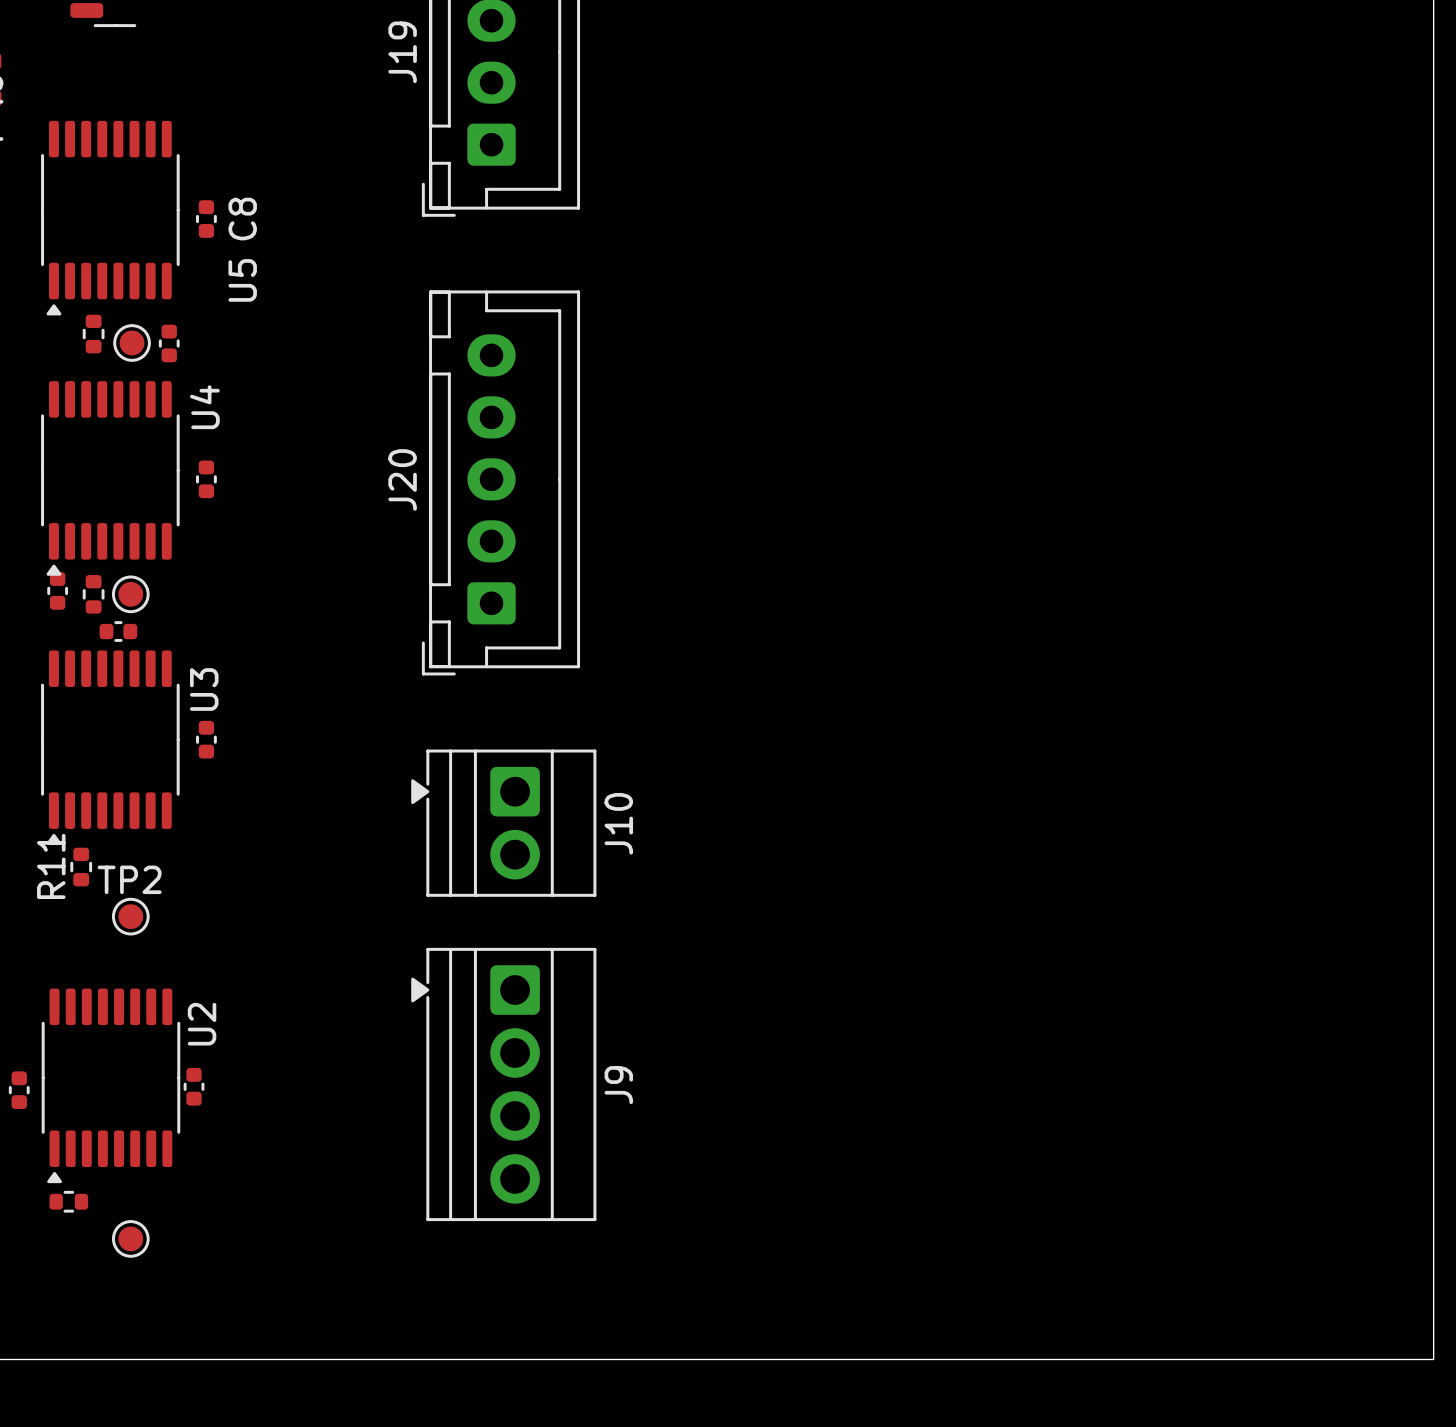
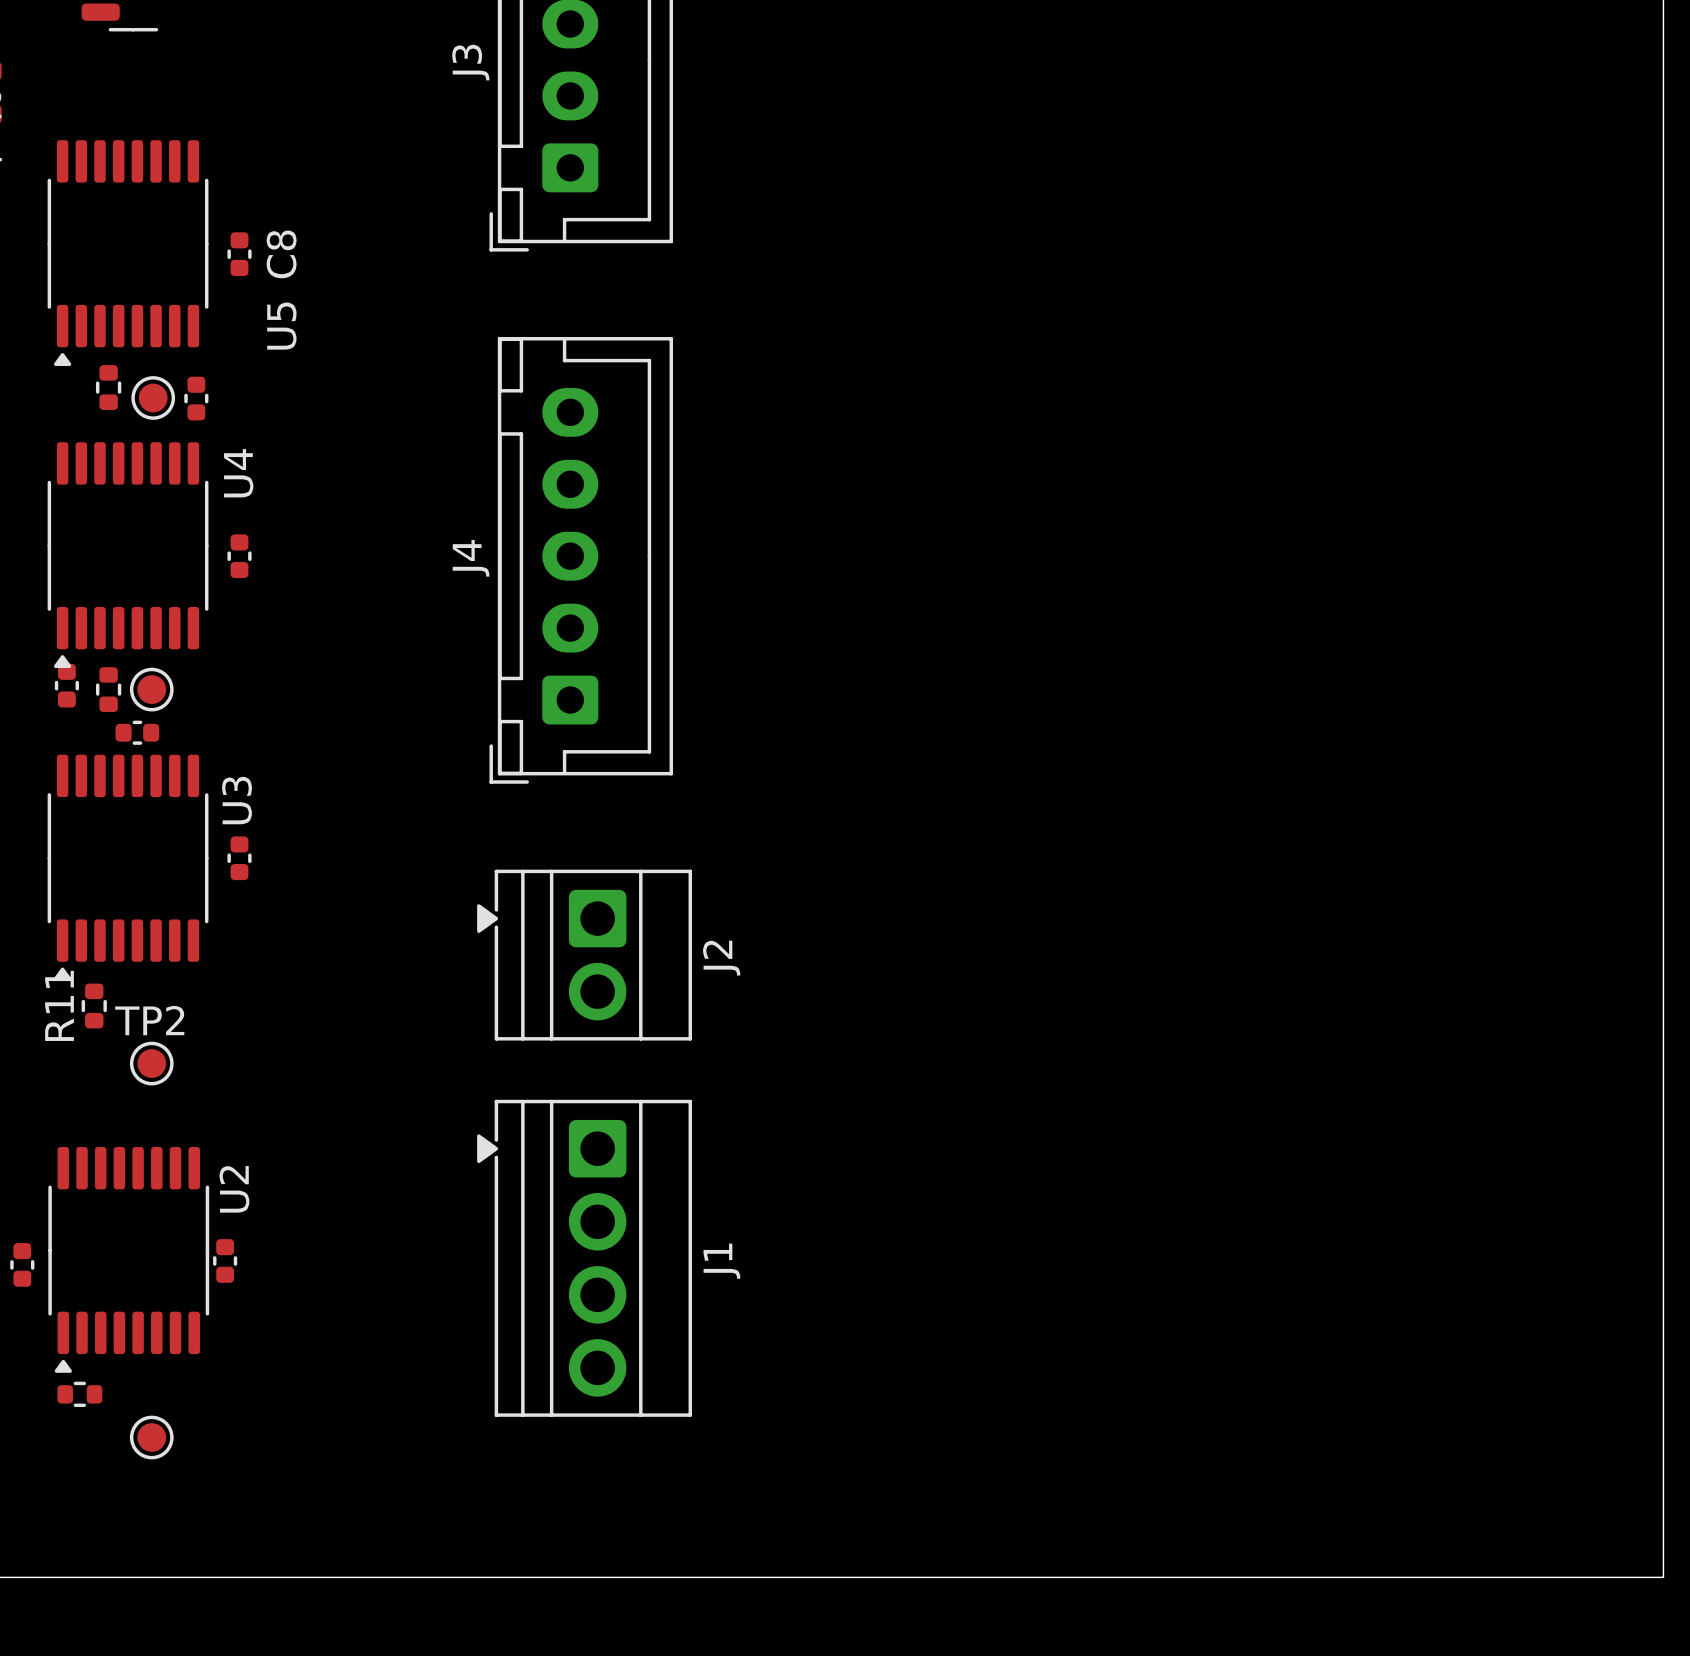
J19 name: J19 (402, 52) -> J3 (470, 62)
J20 name: J20 (402, 479) -> J4 (471, 558)
J10 name: J10 (618, 823) -> J2 (721, 958)
J9 name: J9 (618, 1085) -> J1 (721, 1261)

